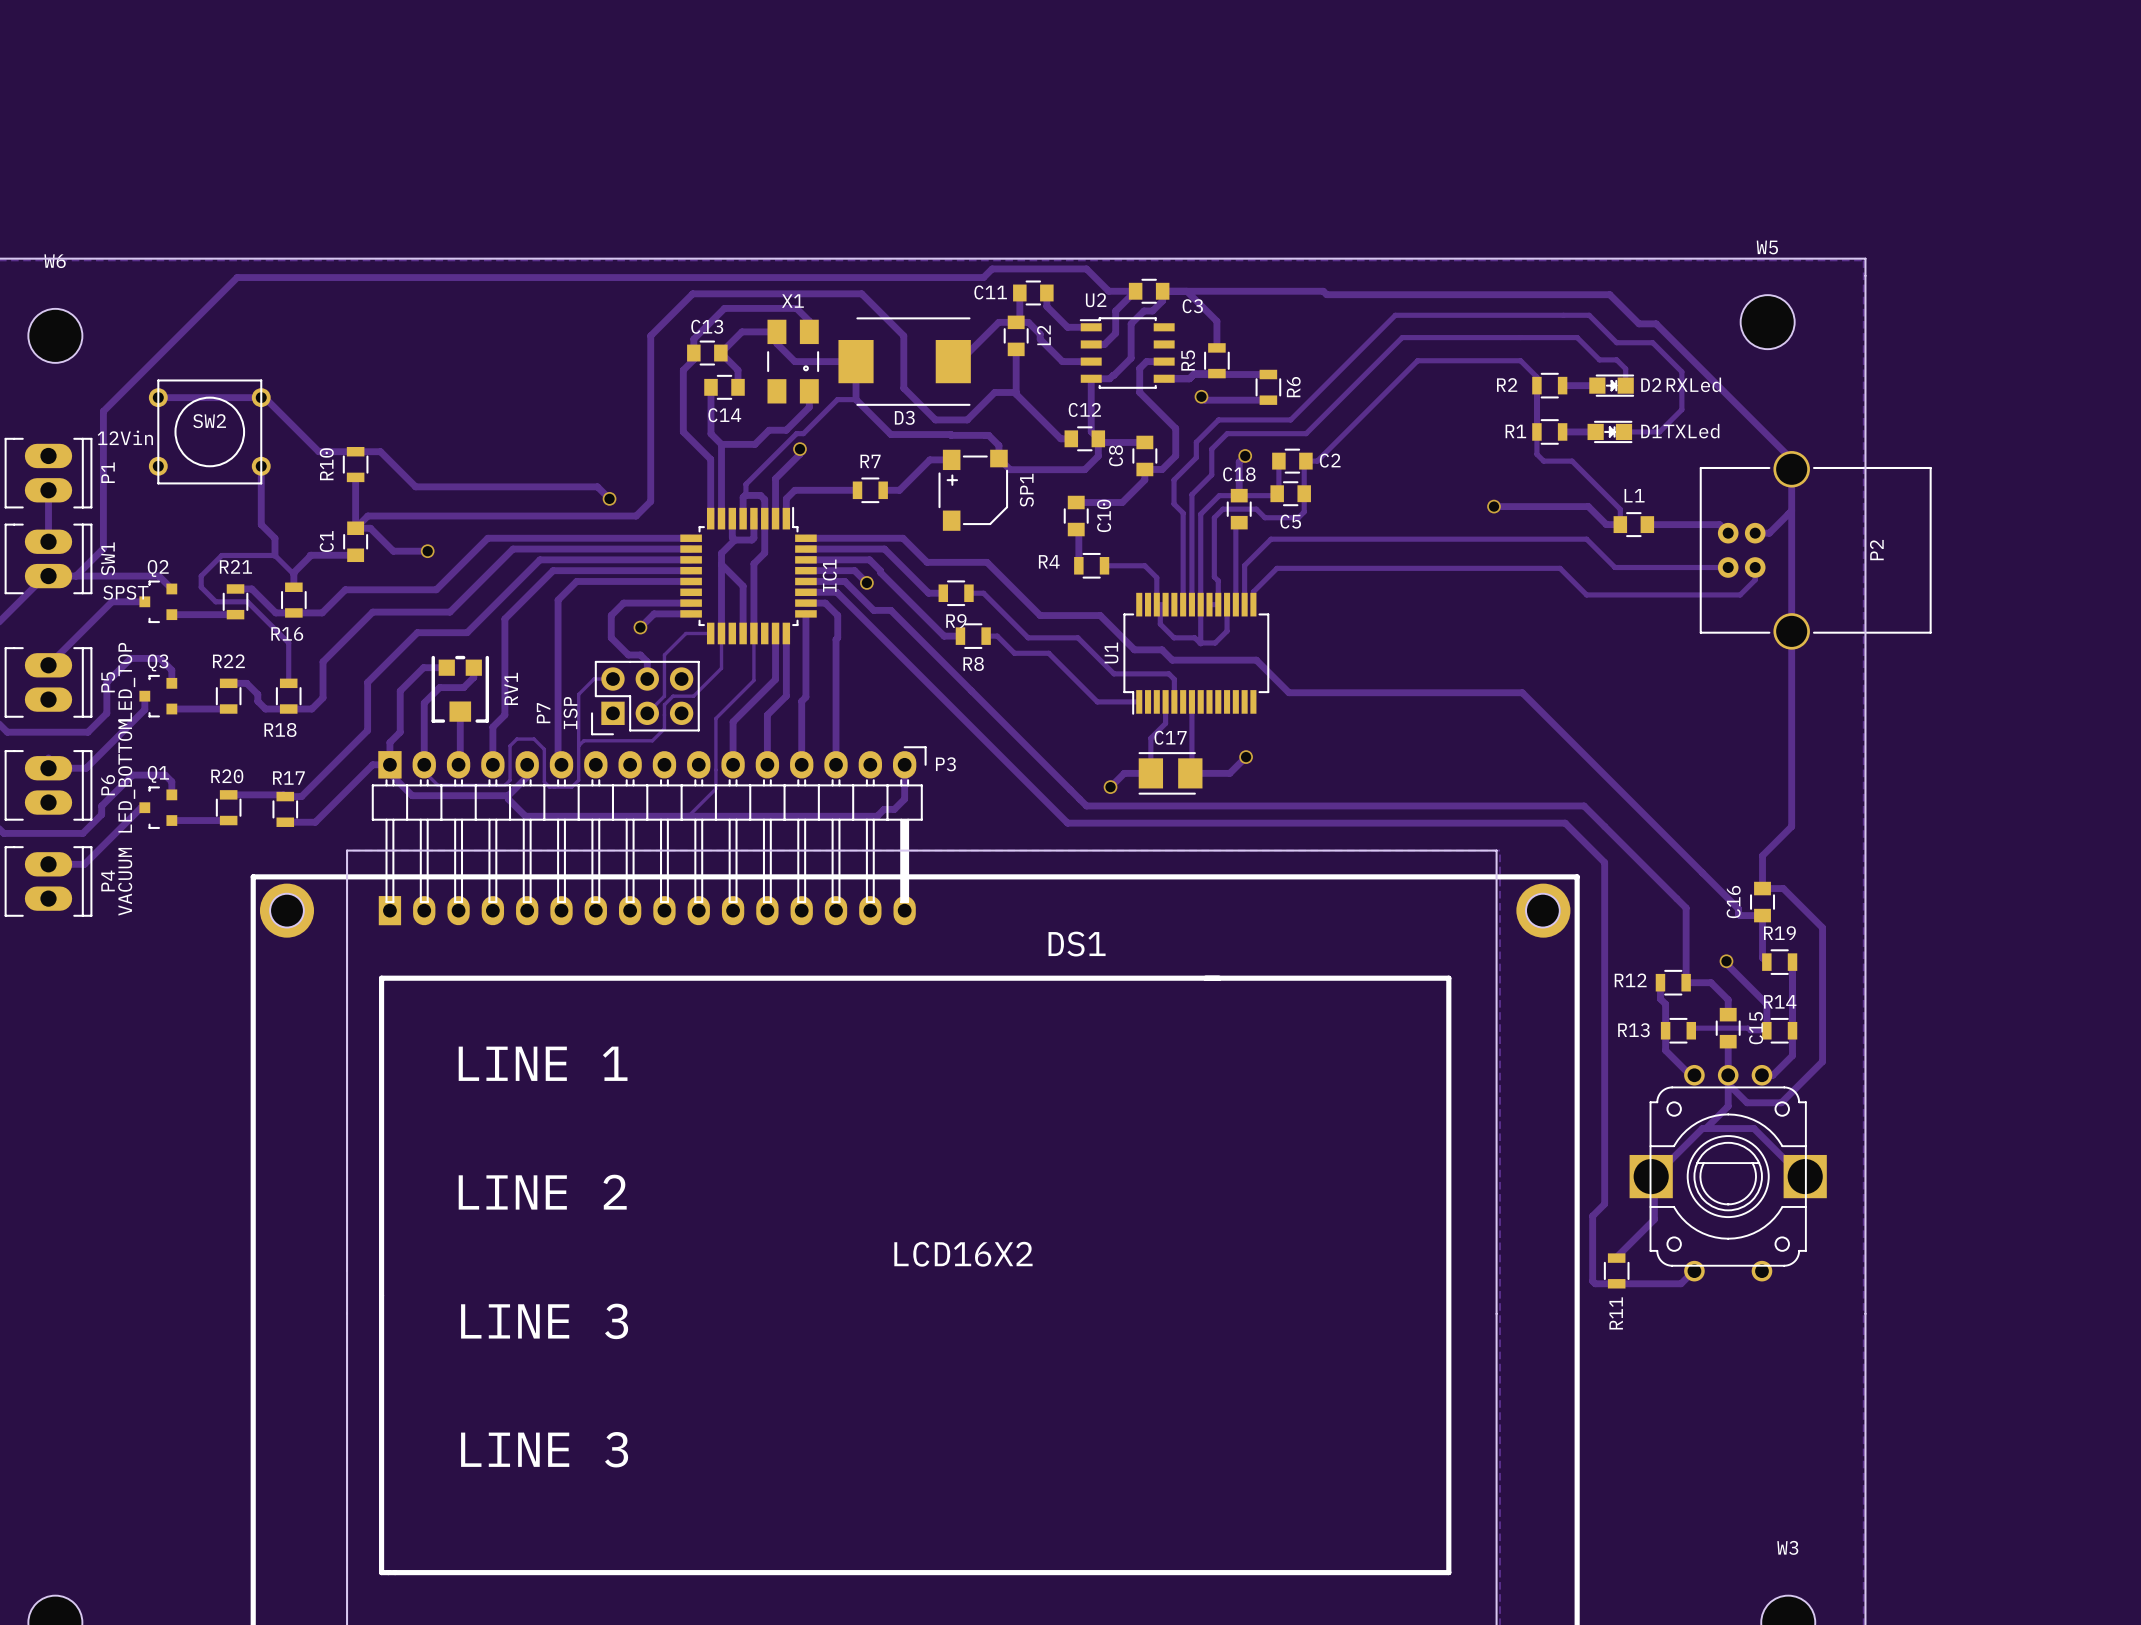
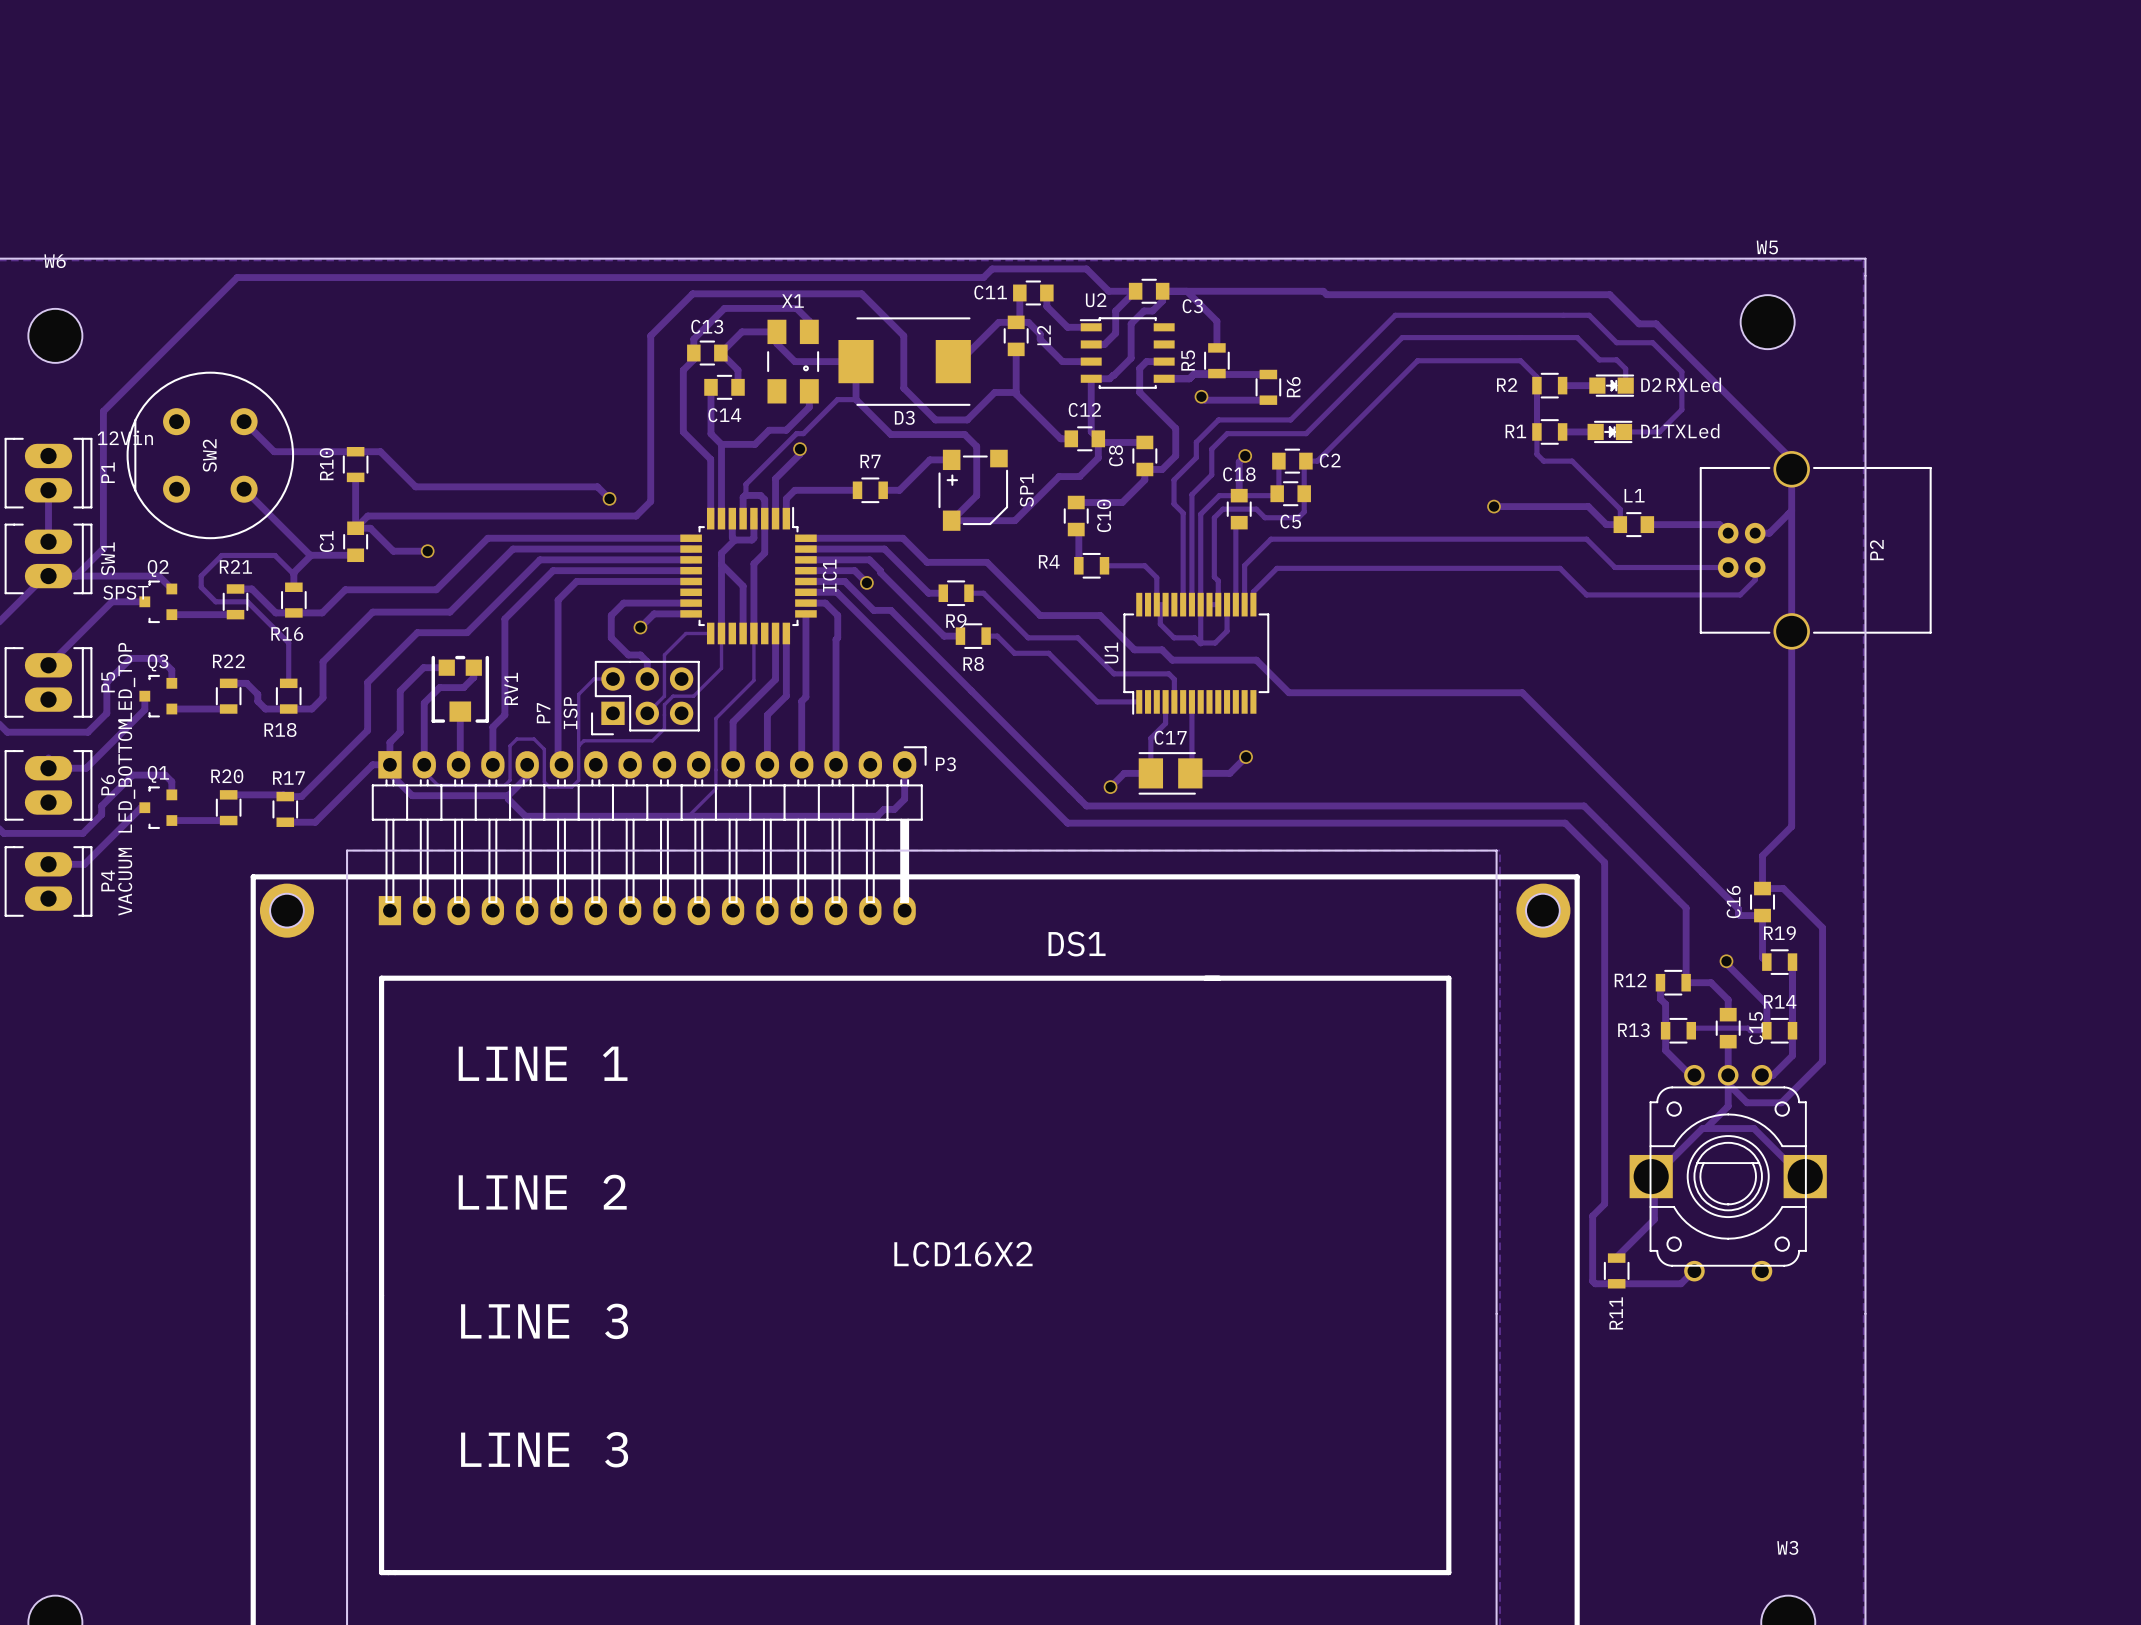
SW2 footprint: [148, 379, 271, 485] -> [126, 371, 295, 540]
track: (158, 397) (264, 397) (318, 451) -> (244, 421) (274, 451) (318, 451)
track: (950, 434) (988, 435) (998, 445) (998, 458) (1010, 469) (1084, 469) (1098, 456) -> (950, 434) (964, 434) (976, 446) (976, 495) (951, 520) (1014, 520) (1059, 476) (1079, 476) (1098, 456)
track: (261, 466) (261, 524) (274, 538) (274, 555) -> none
track: none -> (244, 489) (310, 555)

